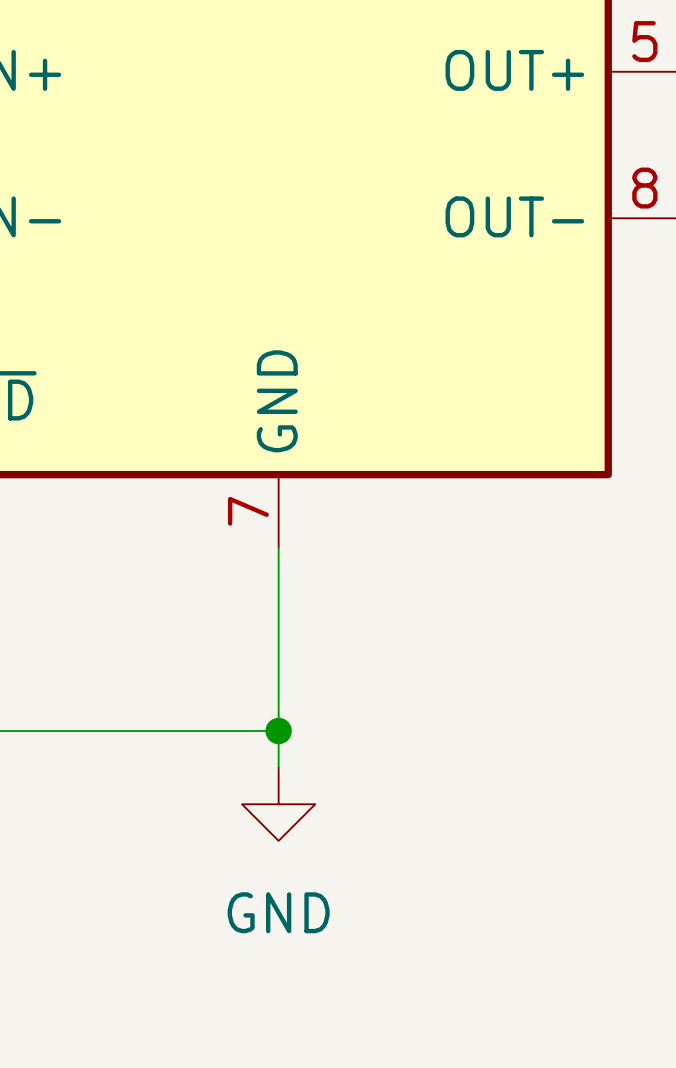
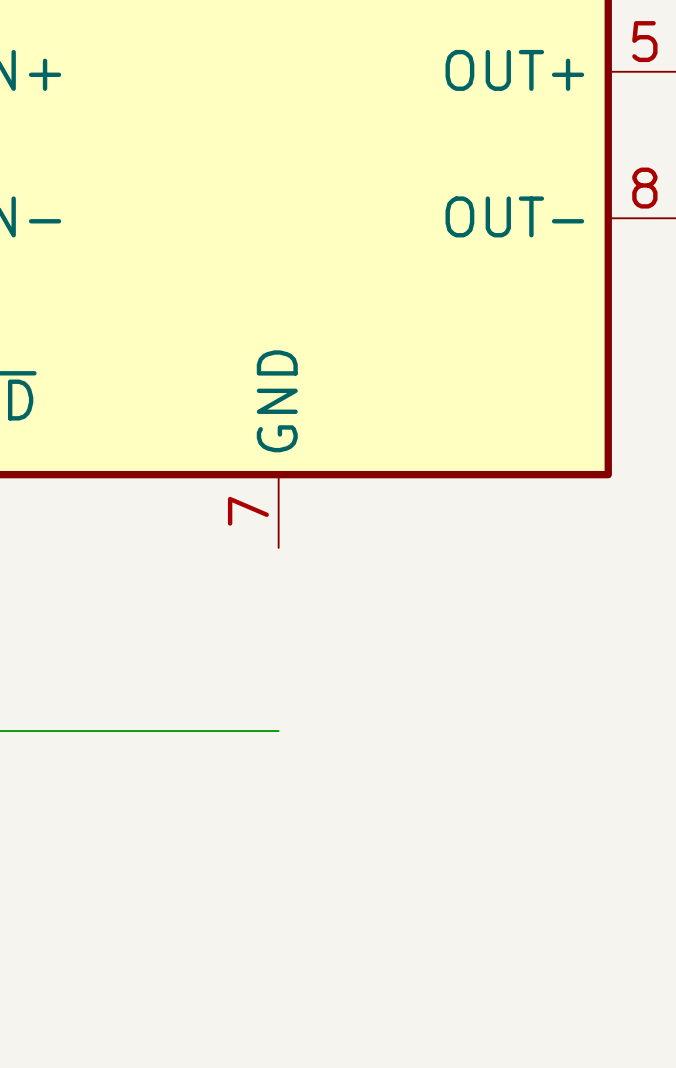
wire: (278, 547) (278, 767) -> none
junction: (278, 731) -> none
power symbol: GND (278, 804) -> none

